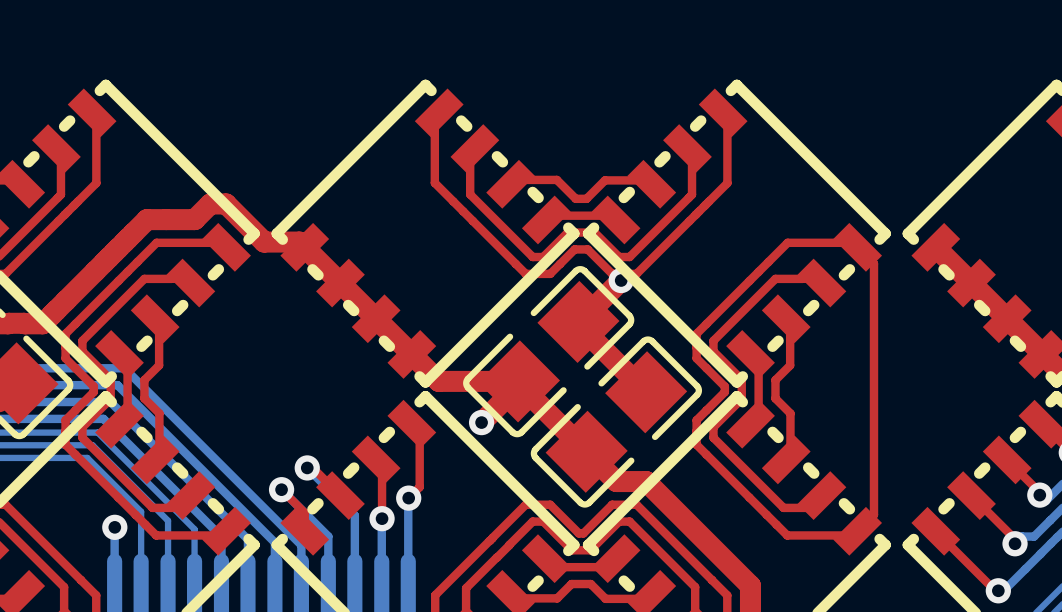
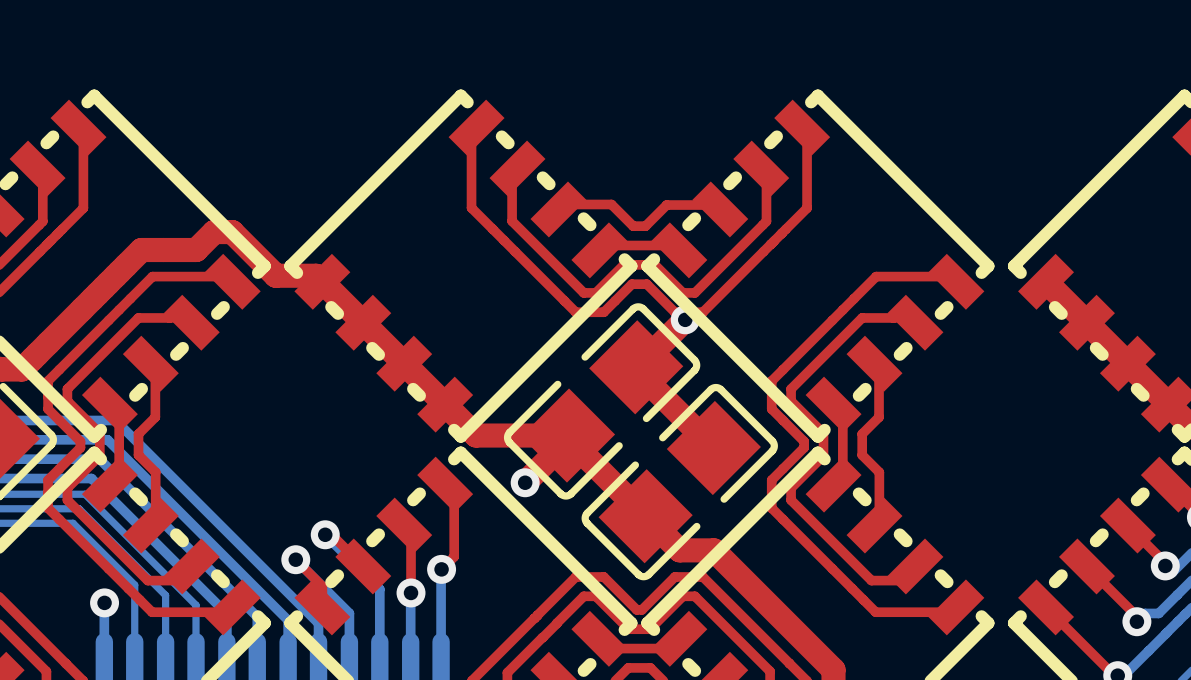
top track: (853, 242) (873, 263) (873, 514) (857, 531) -> none

